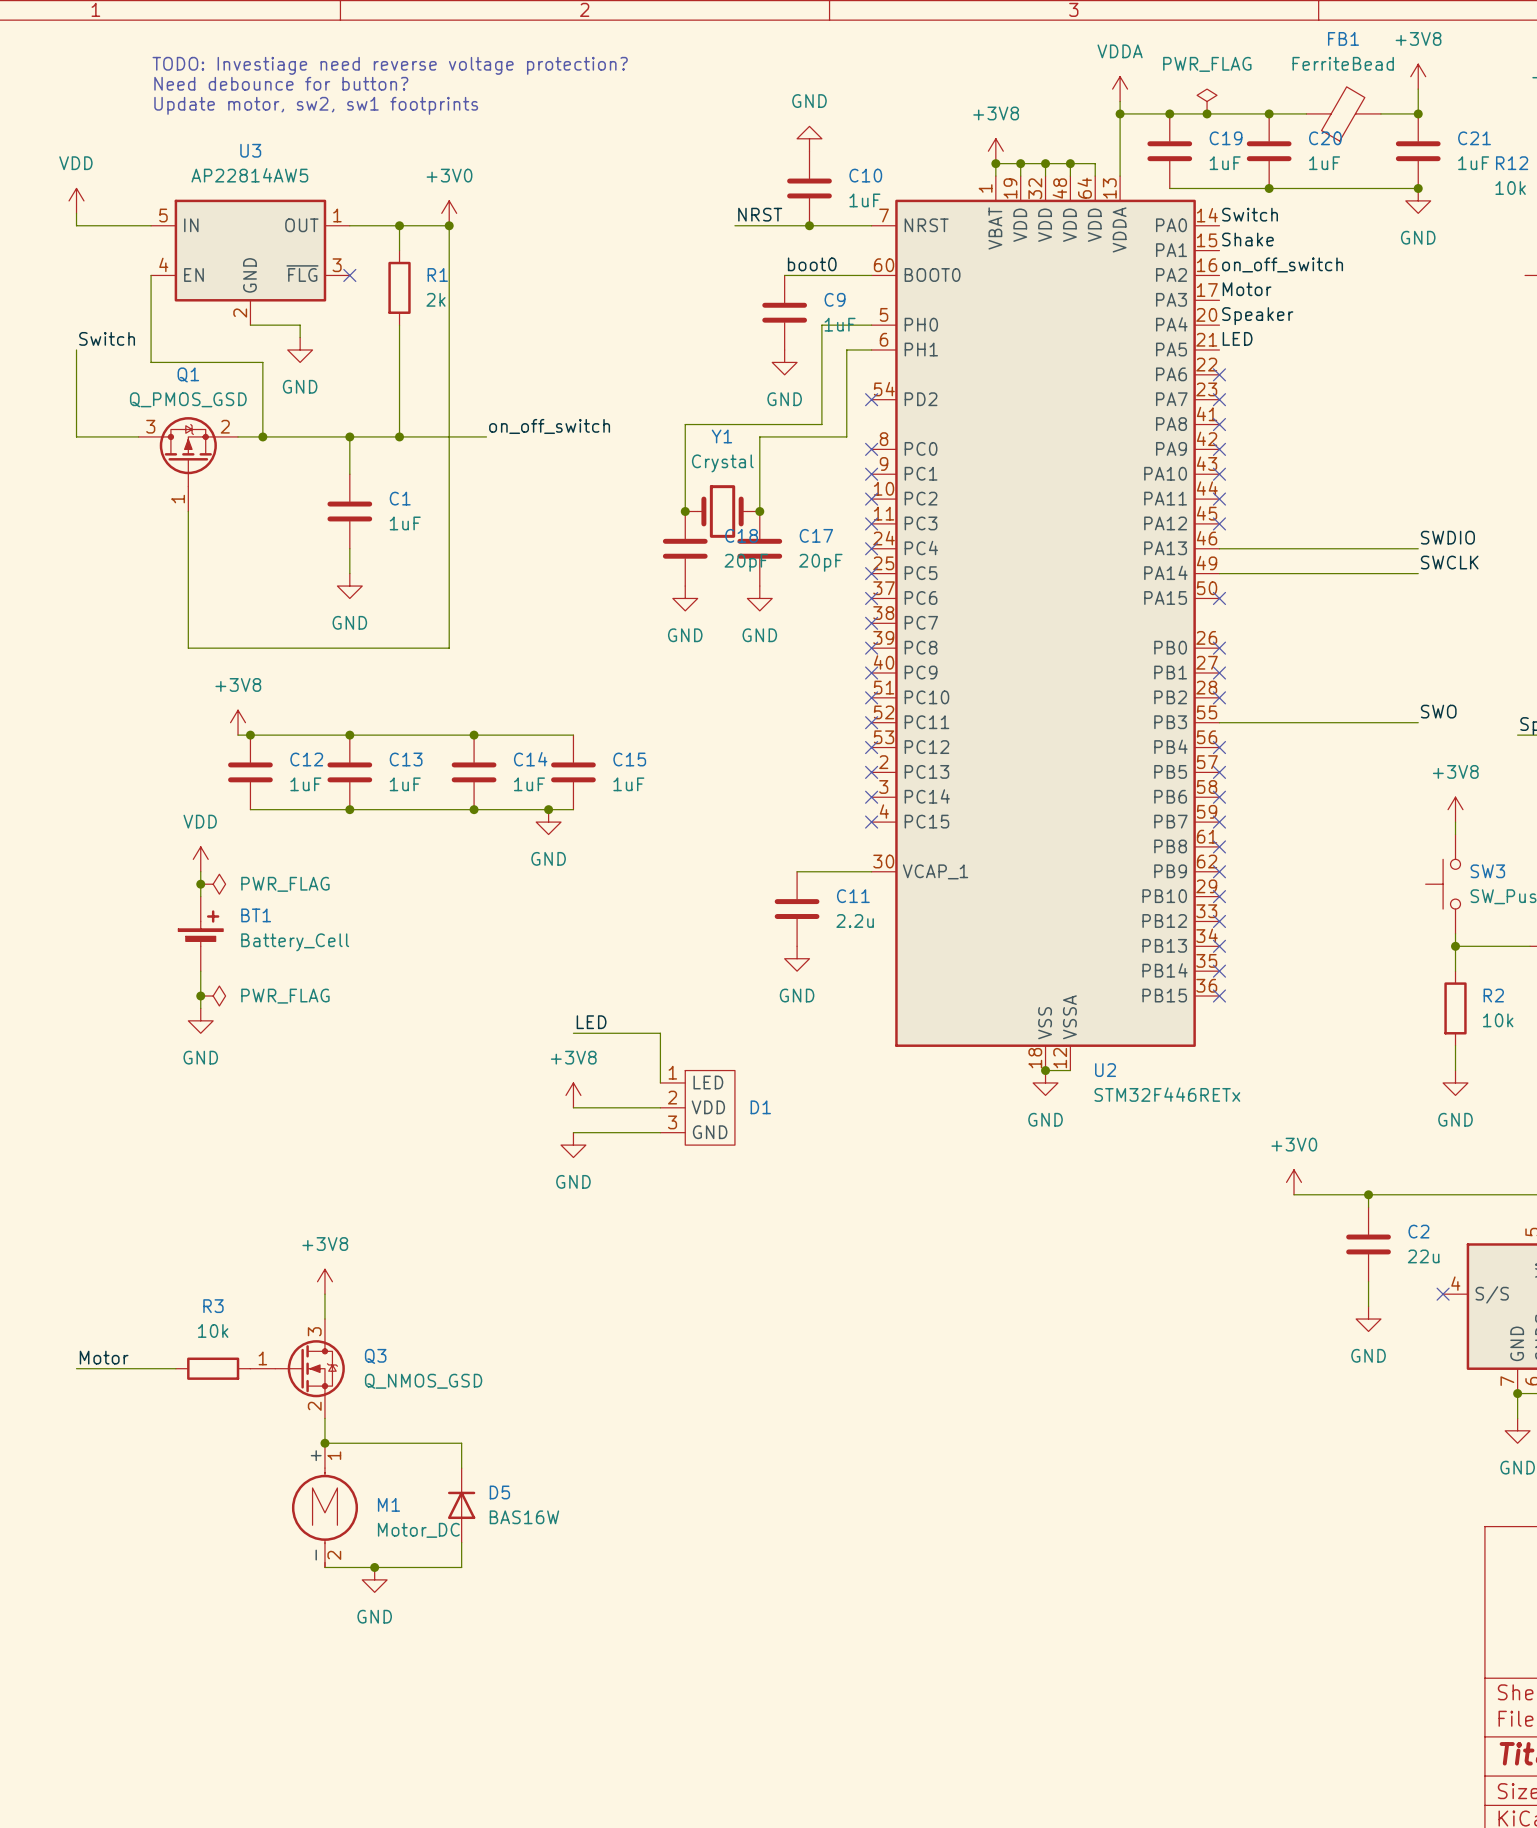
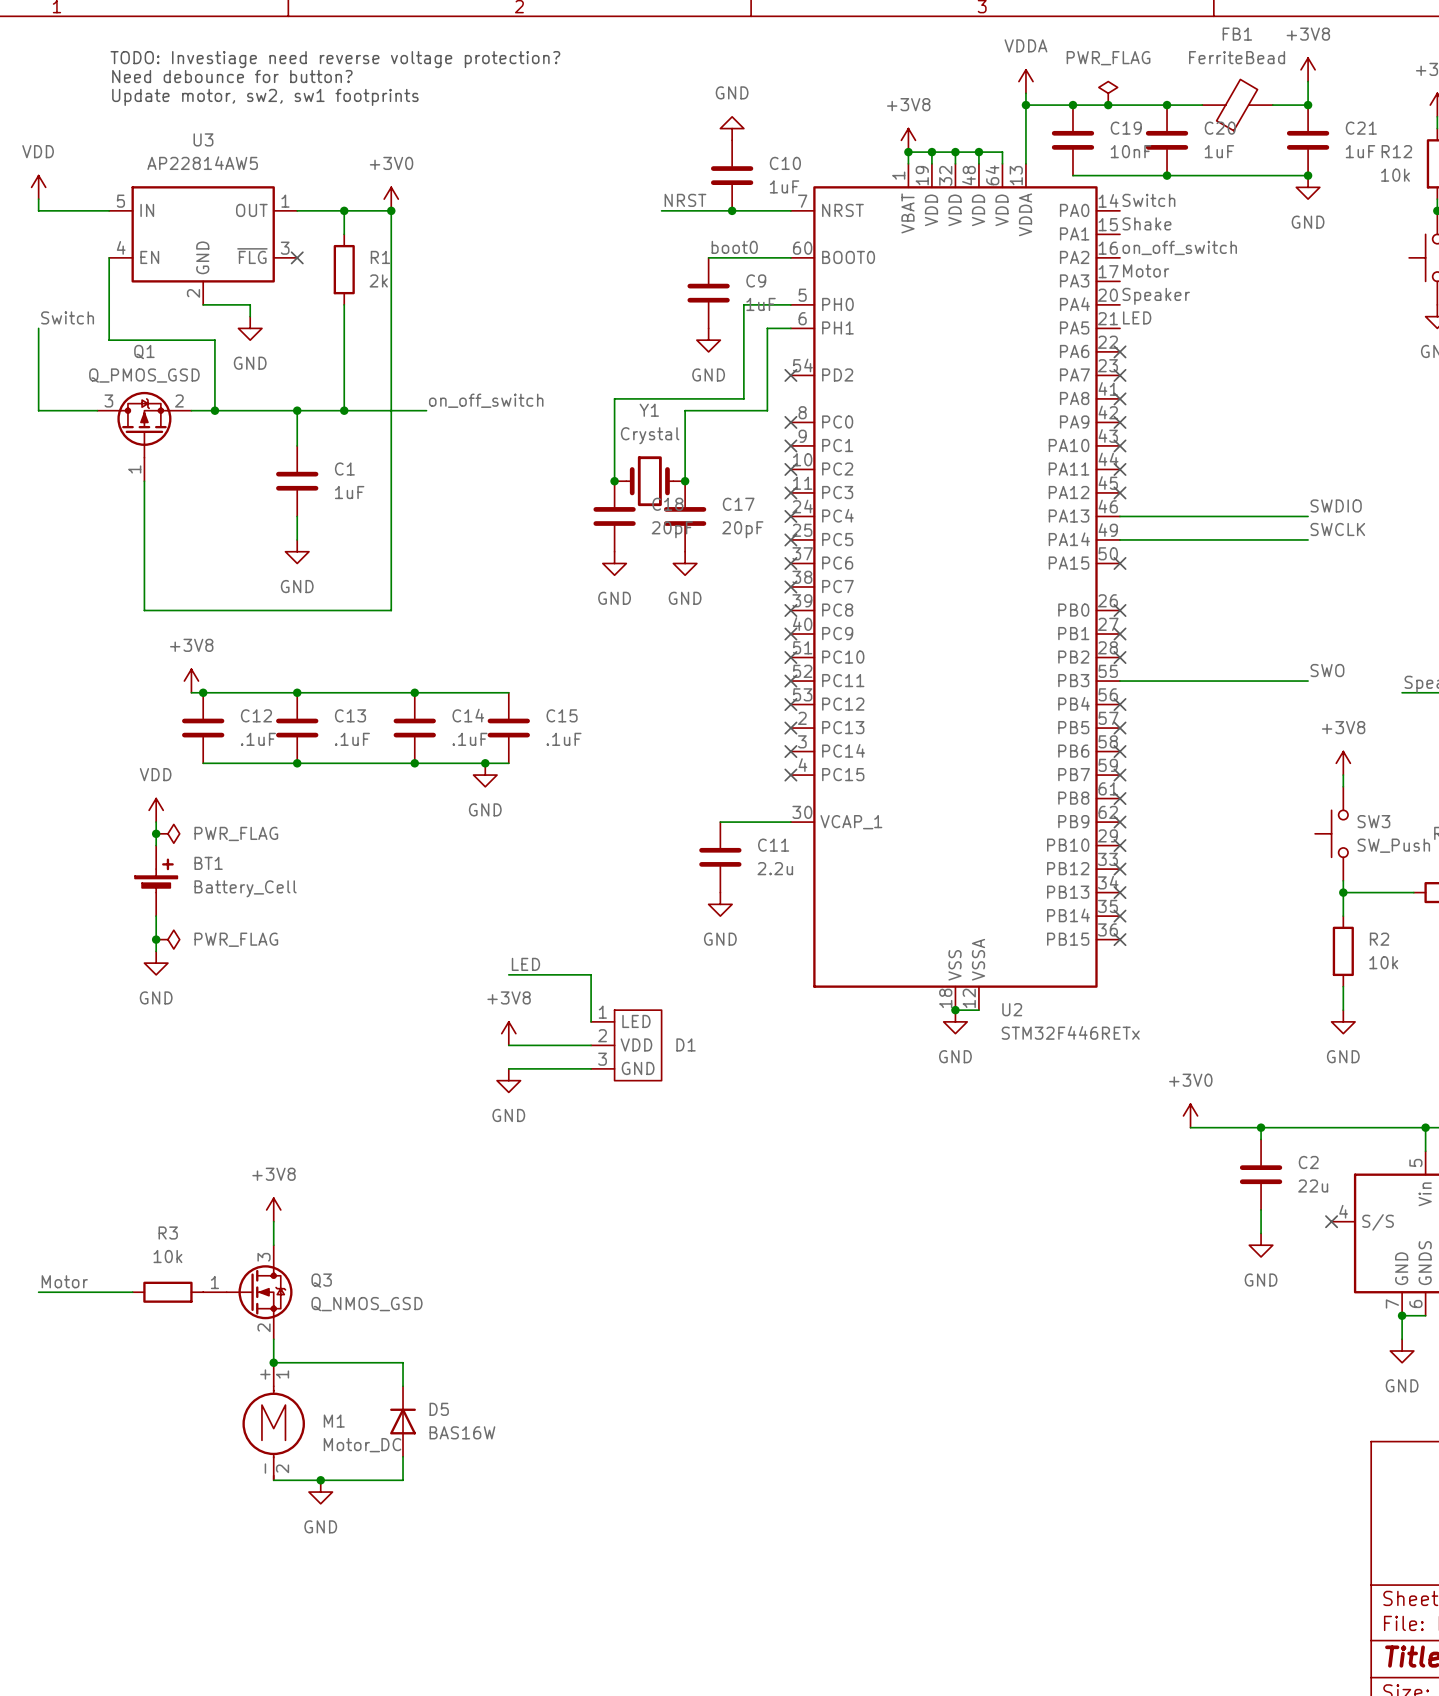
C19 value: 1uF (1225, 163) -> 10nF (1131, 151)
C12 value: 1uF (305, 784) -> .1uF (258, 739)
C13 value: 1uF (405, 784) -> .1uF (352, 739)
C14 value: 1uF (529, 784) -> .1uF (469, 739)
C15 value: 1uF (628, 784) -> .1uF (564, 739)

